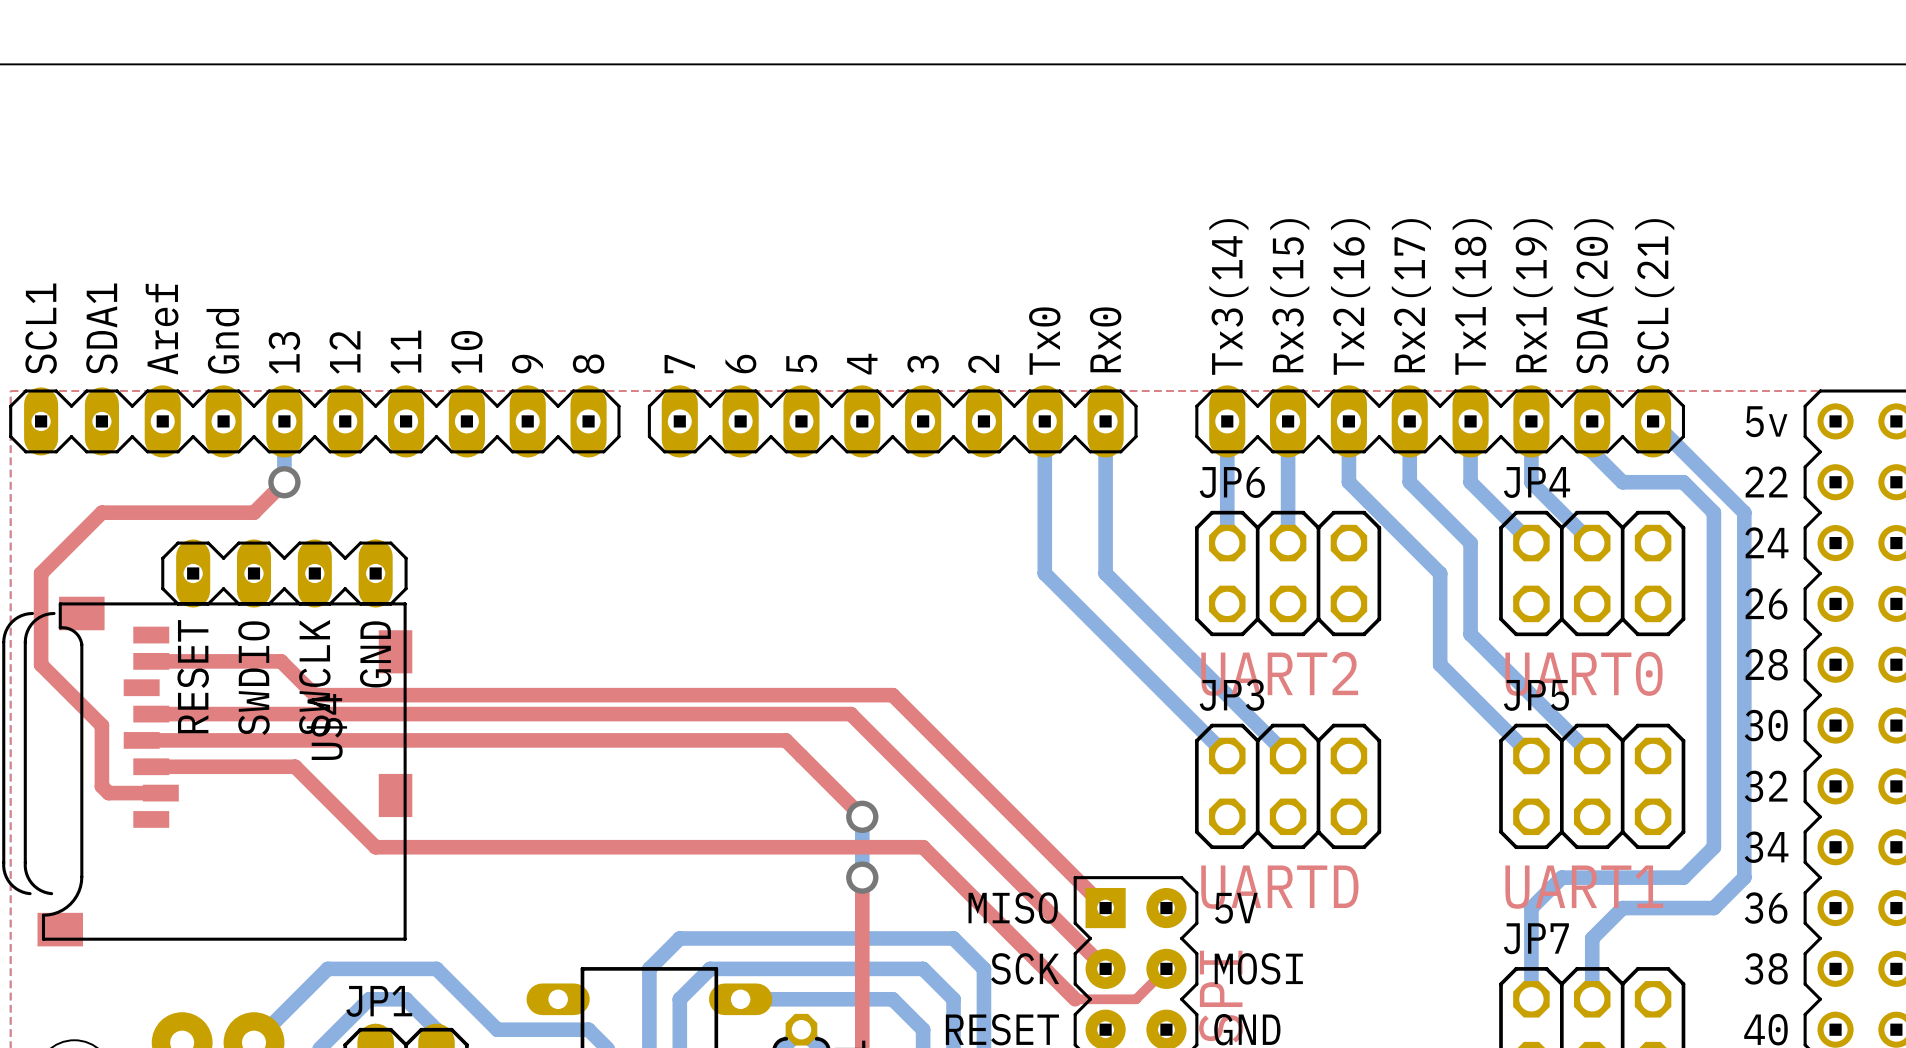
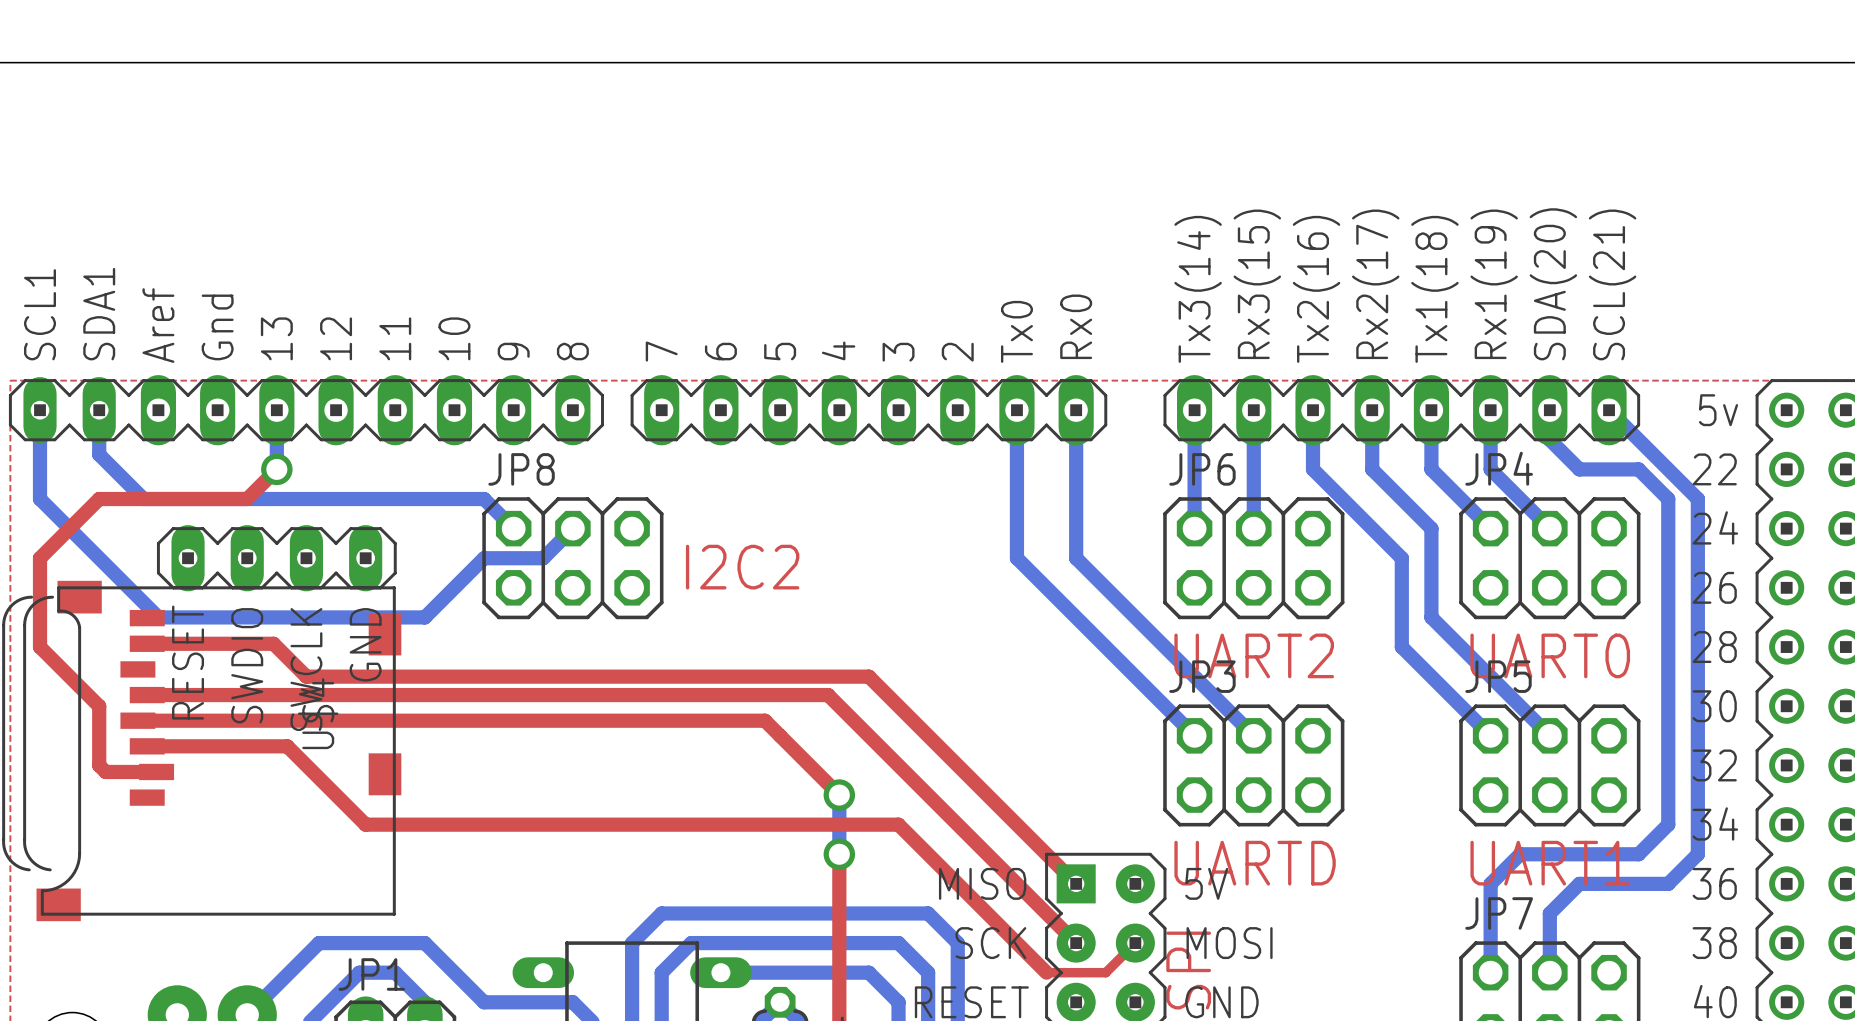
bottom track: none -> (40, 410) (40, 499) (158, 617) (424, 617) (484, 558) (543, 558) (572, 528)
bottom track: none -> (99, 410) (99, 454) (143, 499) (484, 499) (513, 528)
JP8: none -> (572, 558)
text: none -> I2C2 (742, 567)

